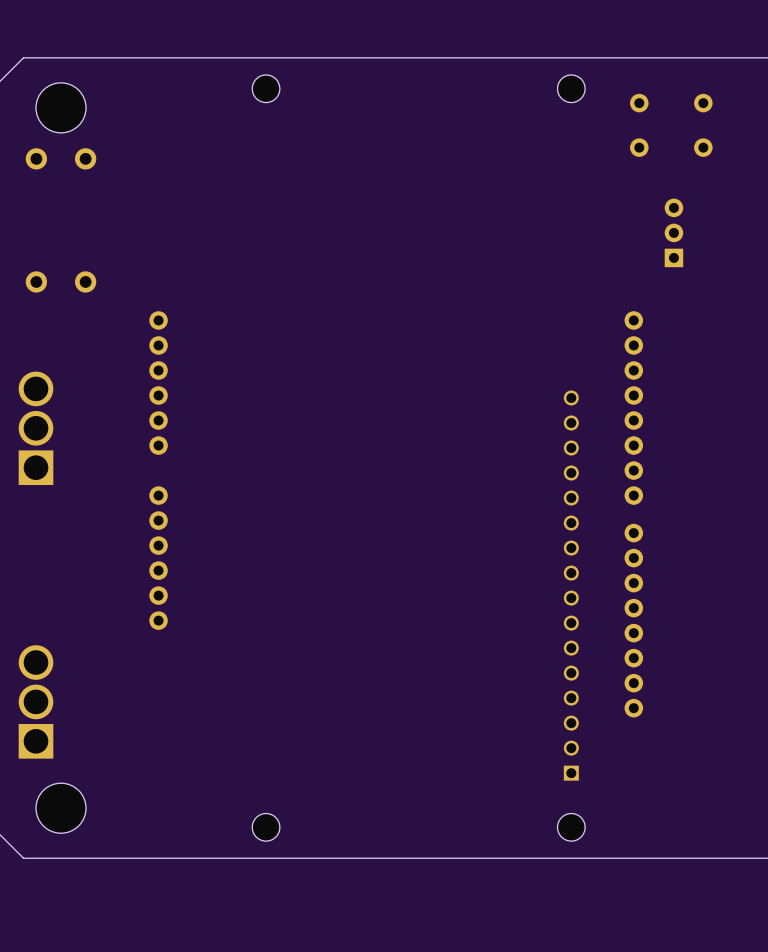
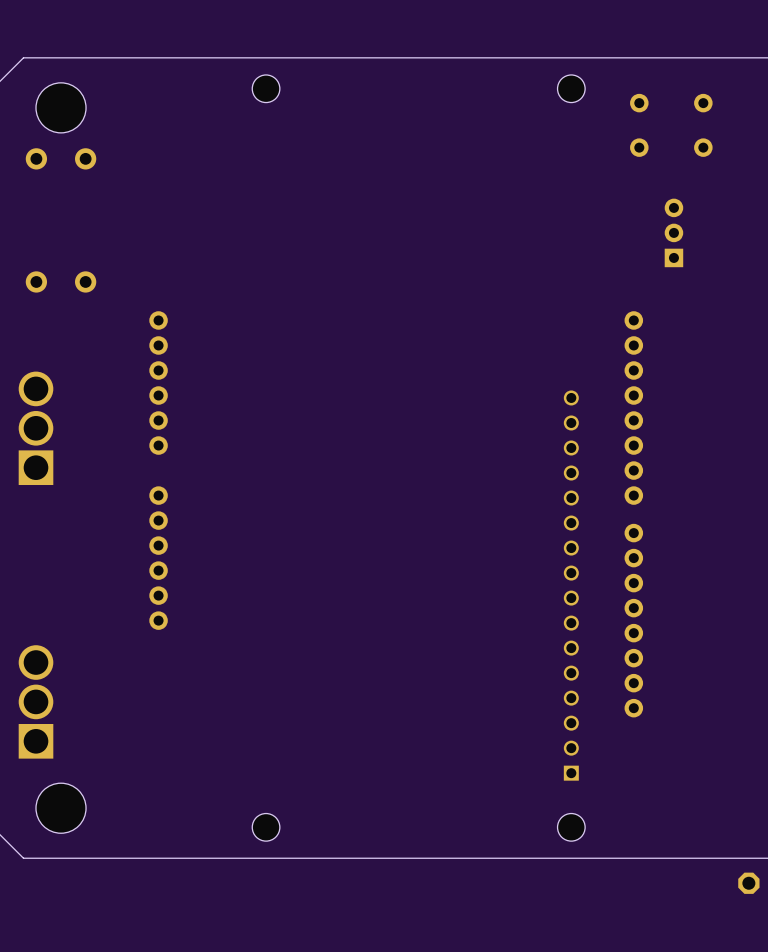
part: none -> (748, 883)

